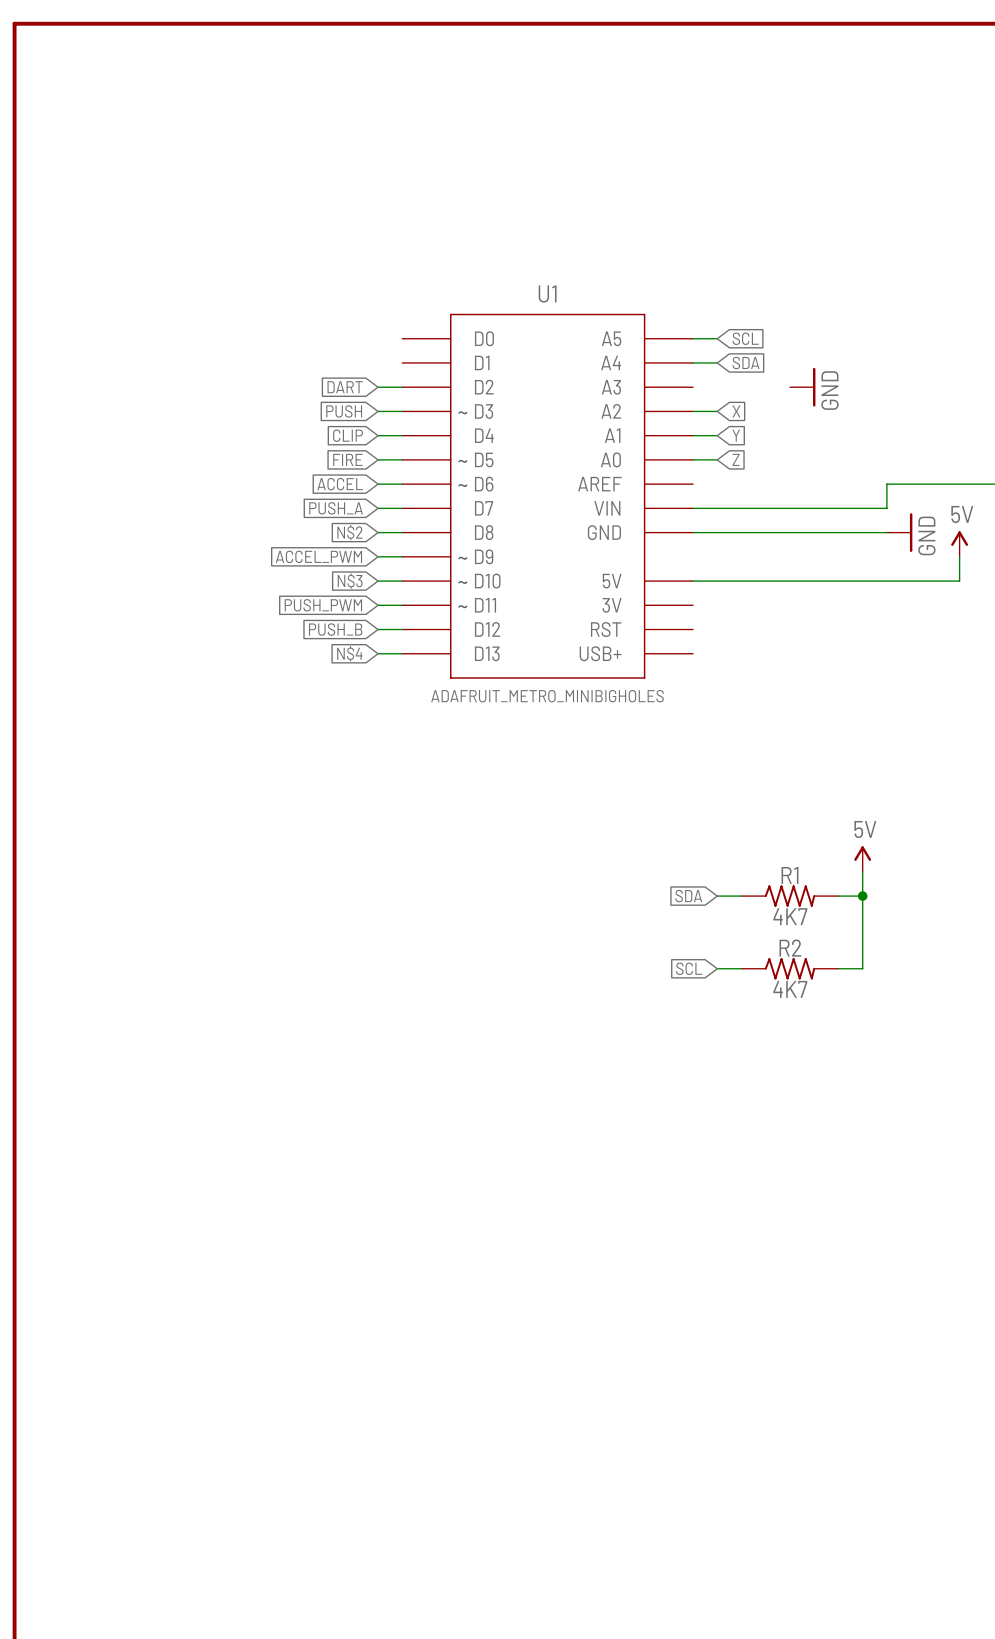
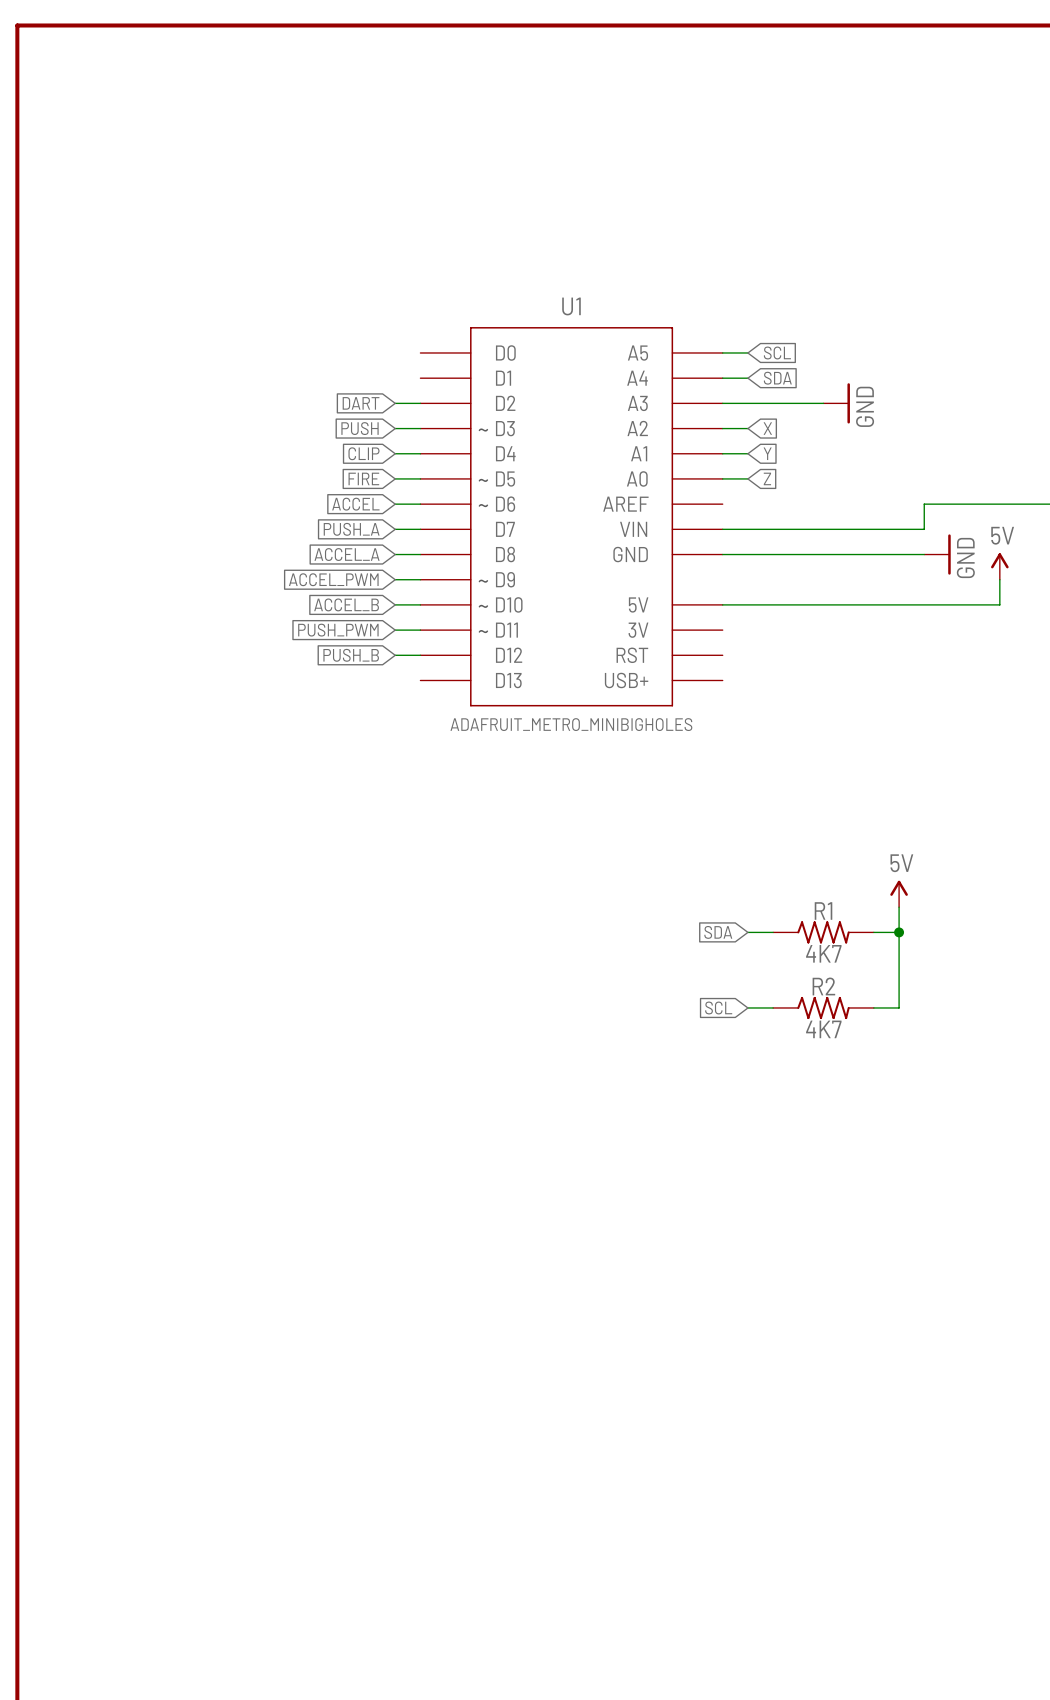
wire: none -> (722, 403) (823, 403)
global label: N$2 (350, 532) -> ACCEL_A (347, 554)
global label: N$3 (350, 581) -> ACCEL_B (346, 604)
global label: N$4 (349, 653) -> none
wire: (378, 653) (402, 653) -> none

